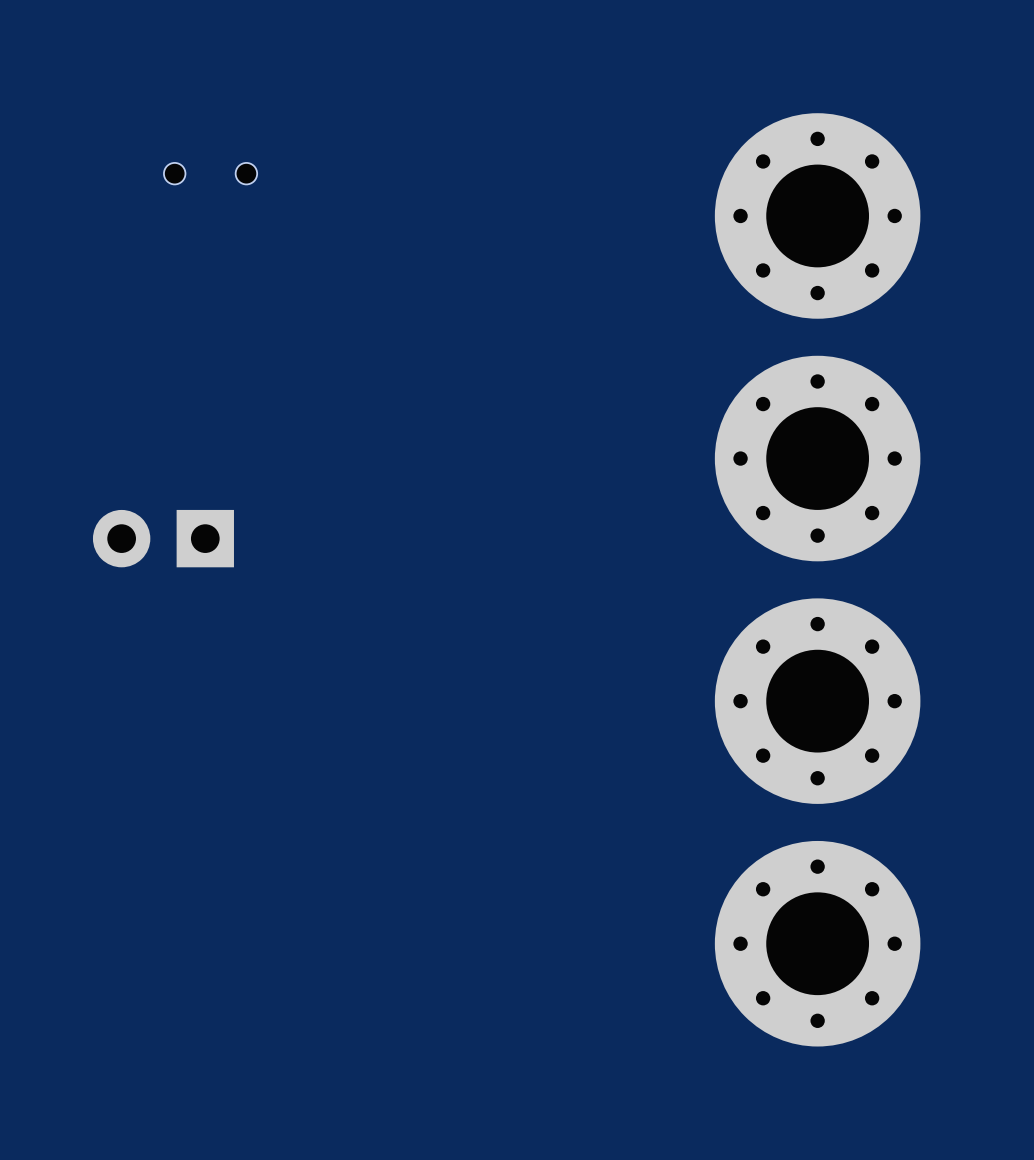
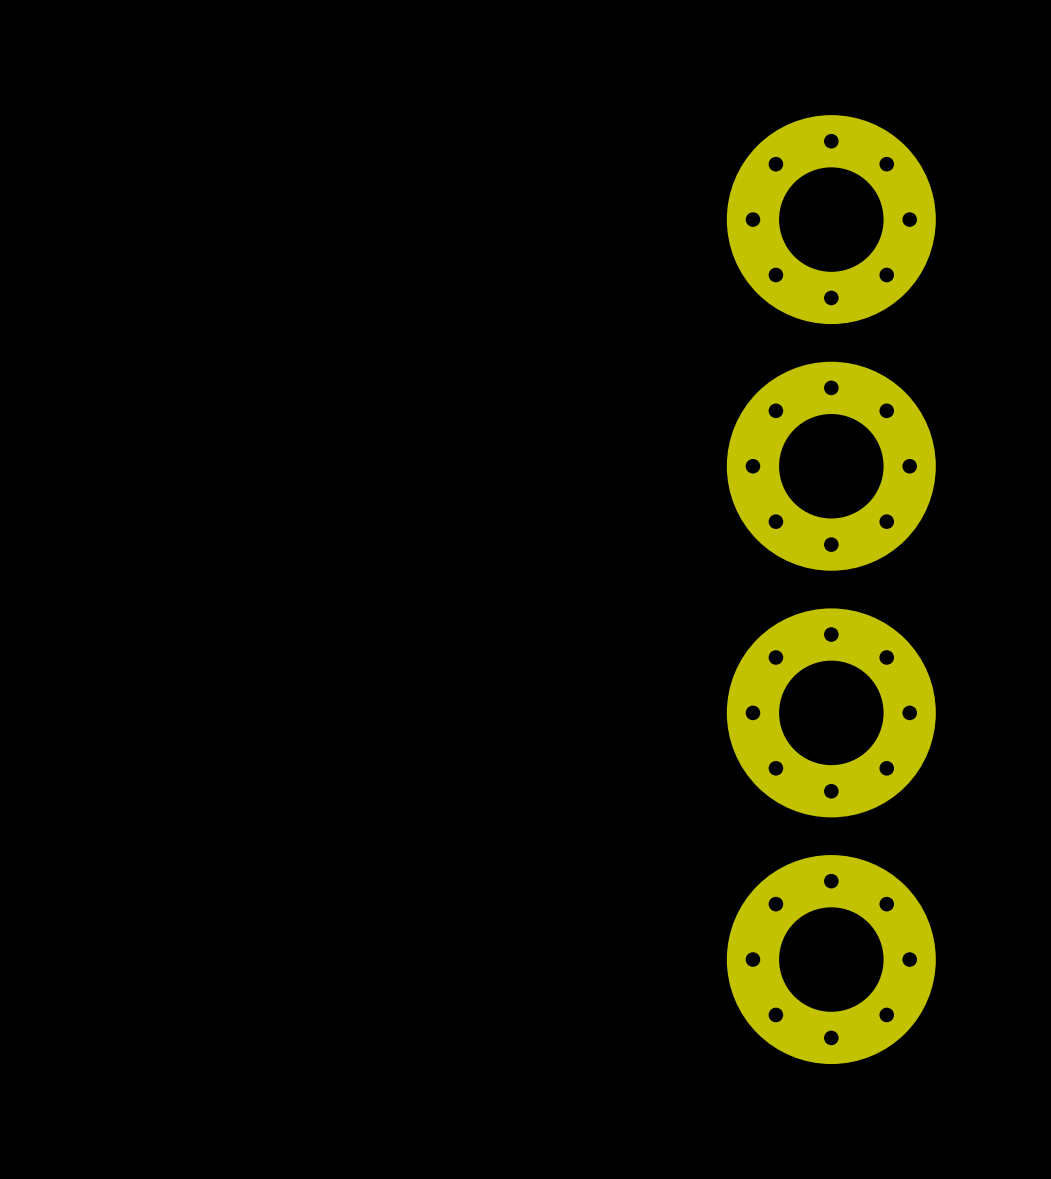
part: (210, 173) -> none
part: (163, 538) -> none

